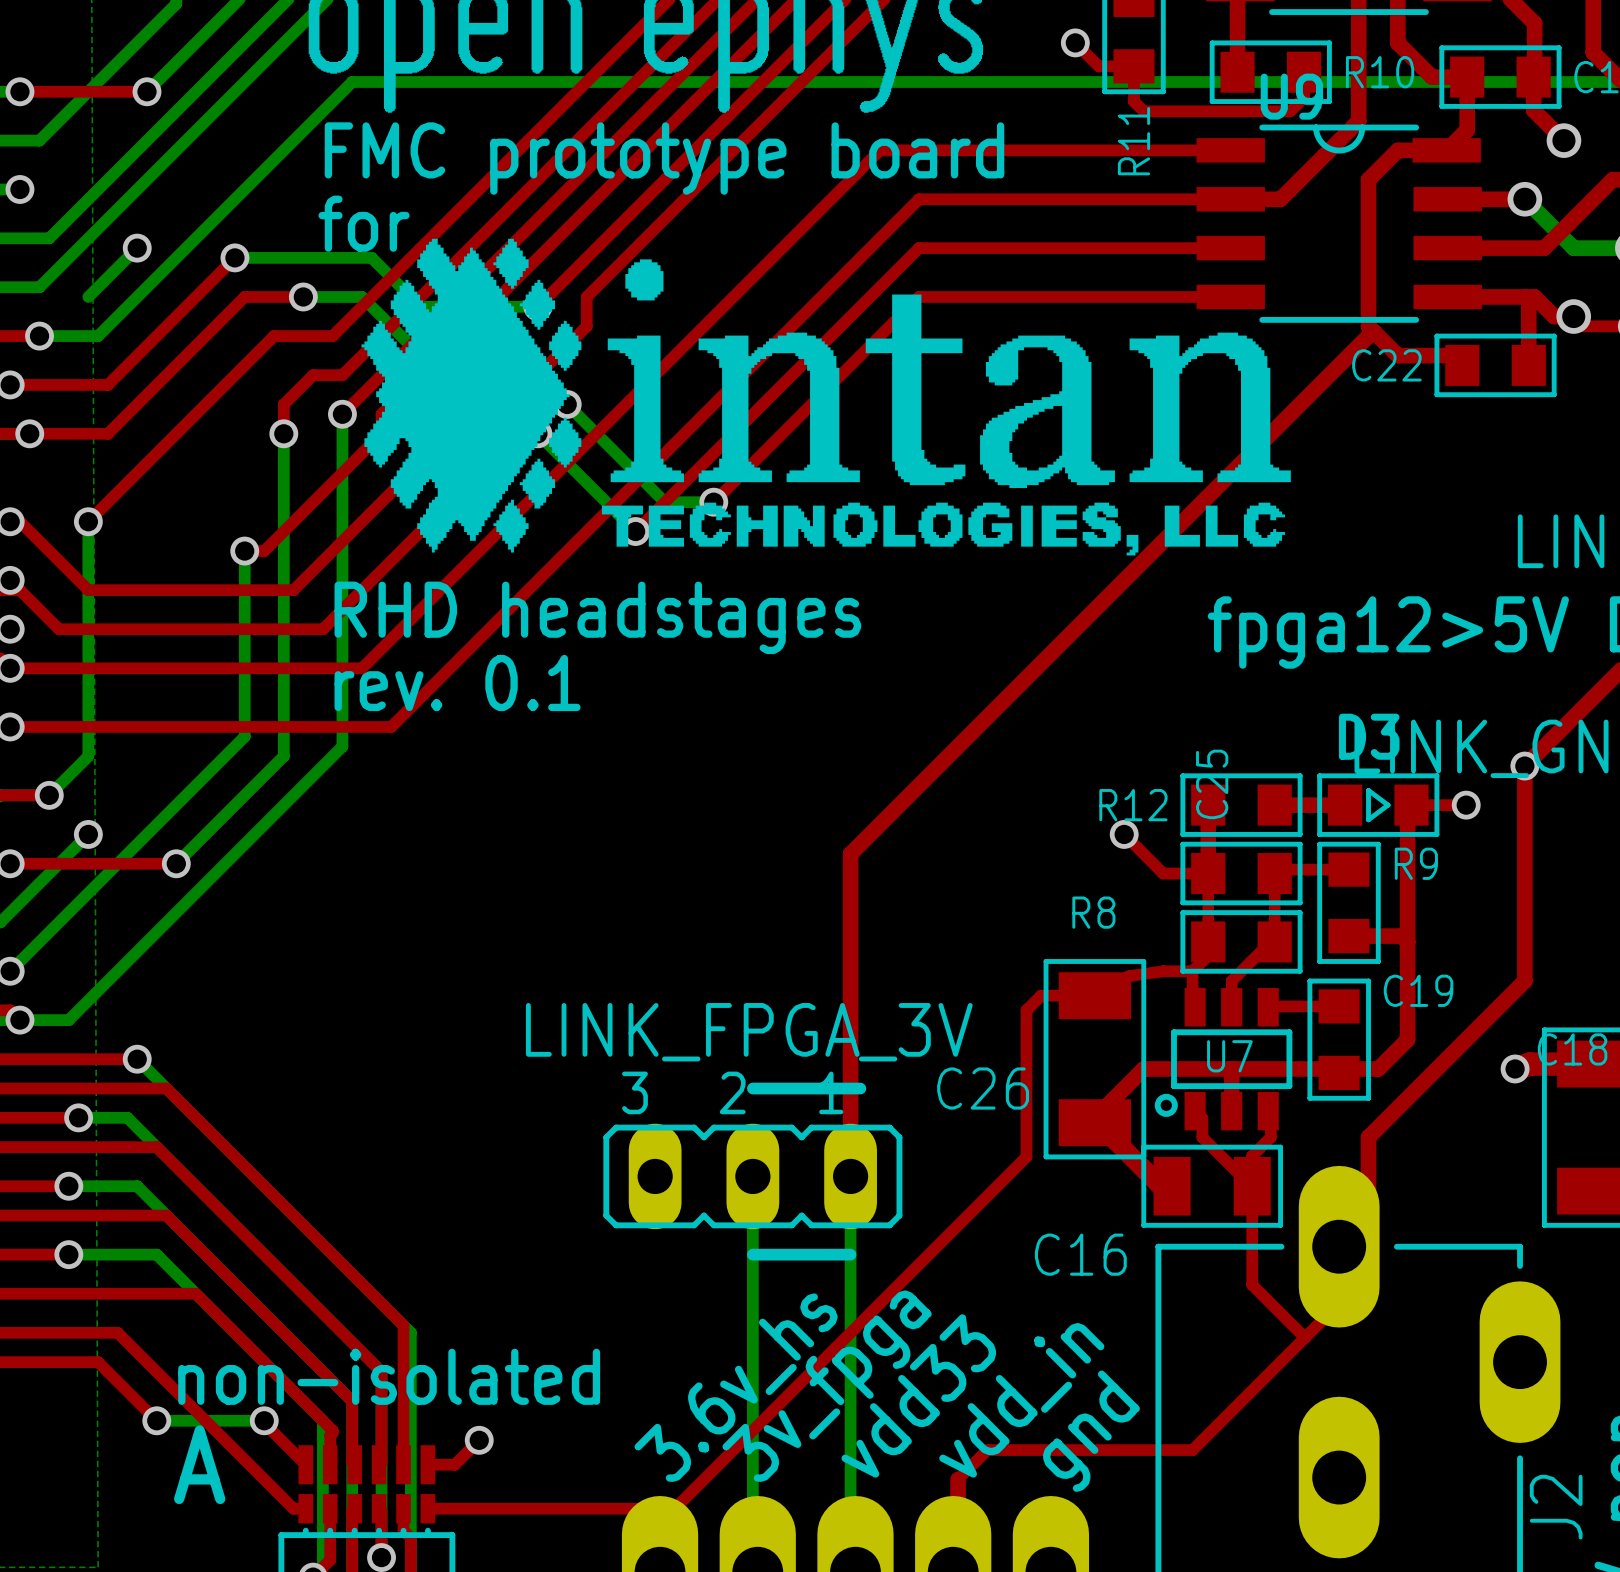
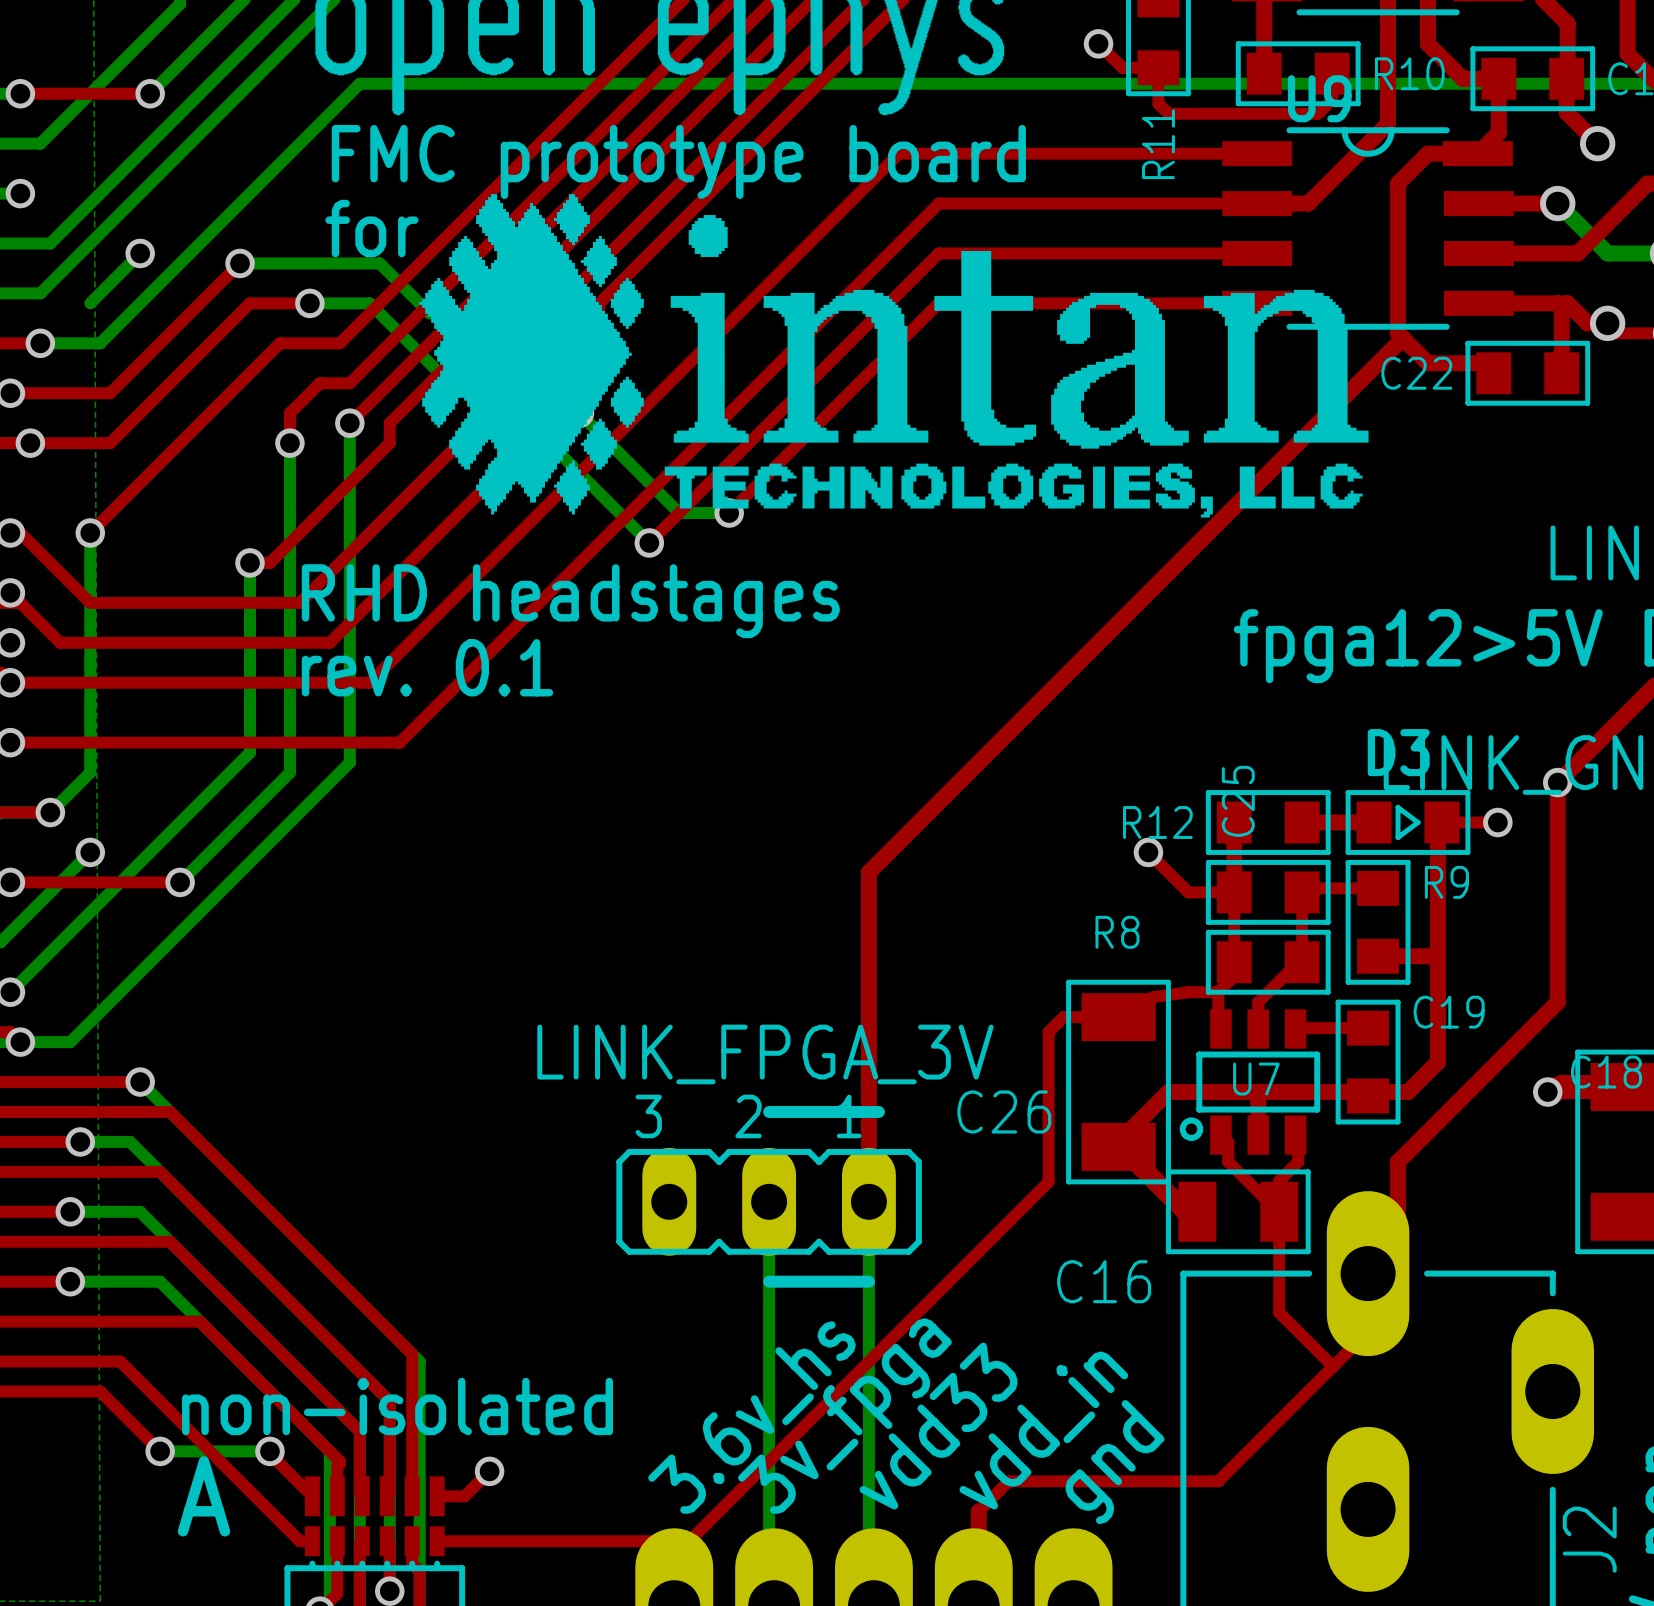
drawing position: (826, 397) -> (893, 355)
text position: RHD headstages (597, 617) -> RHD headstages (570, 601)
text position: rev. 0.1 (457, 682) -> rev. 0.1 (427, 667)

